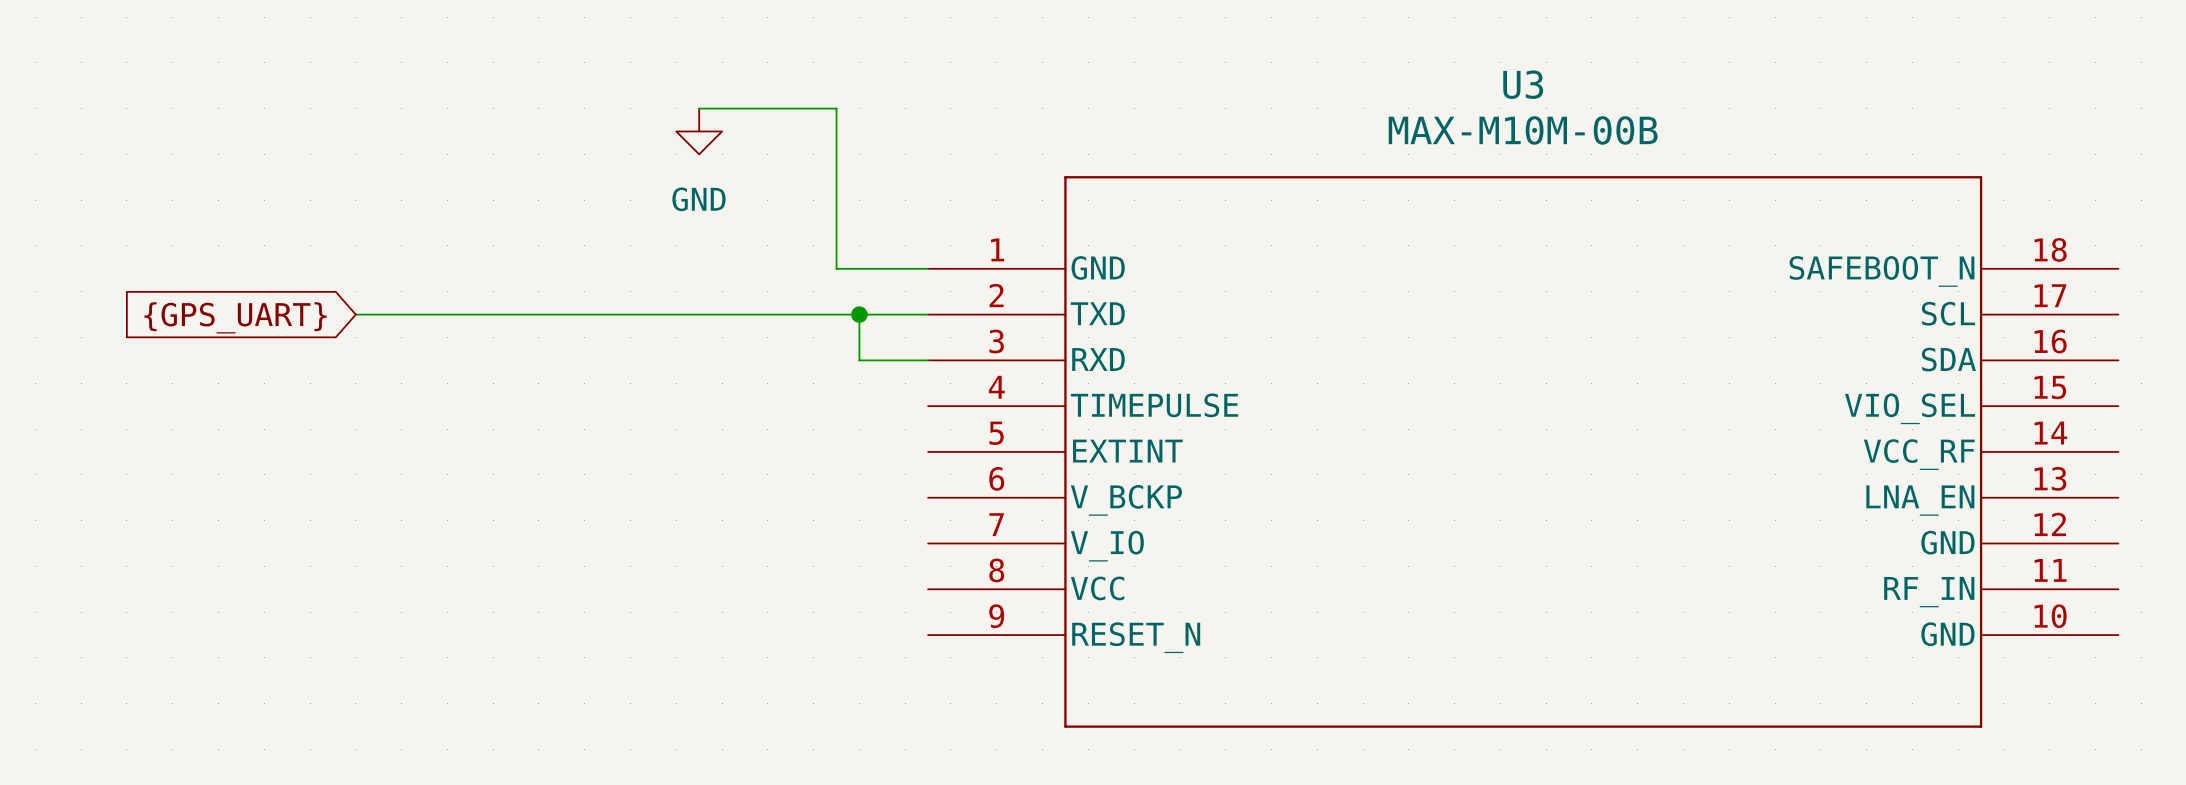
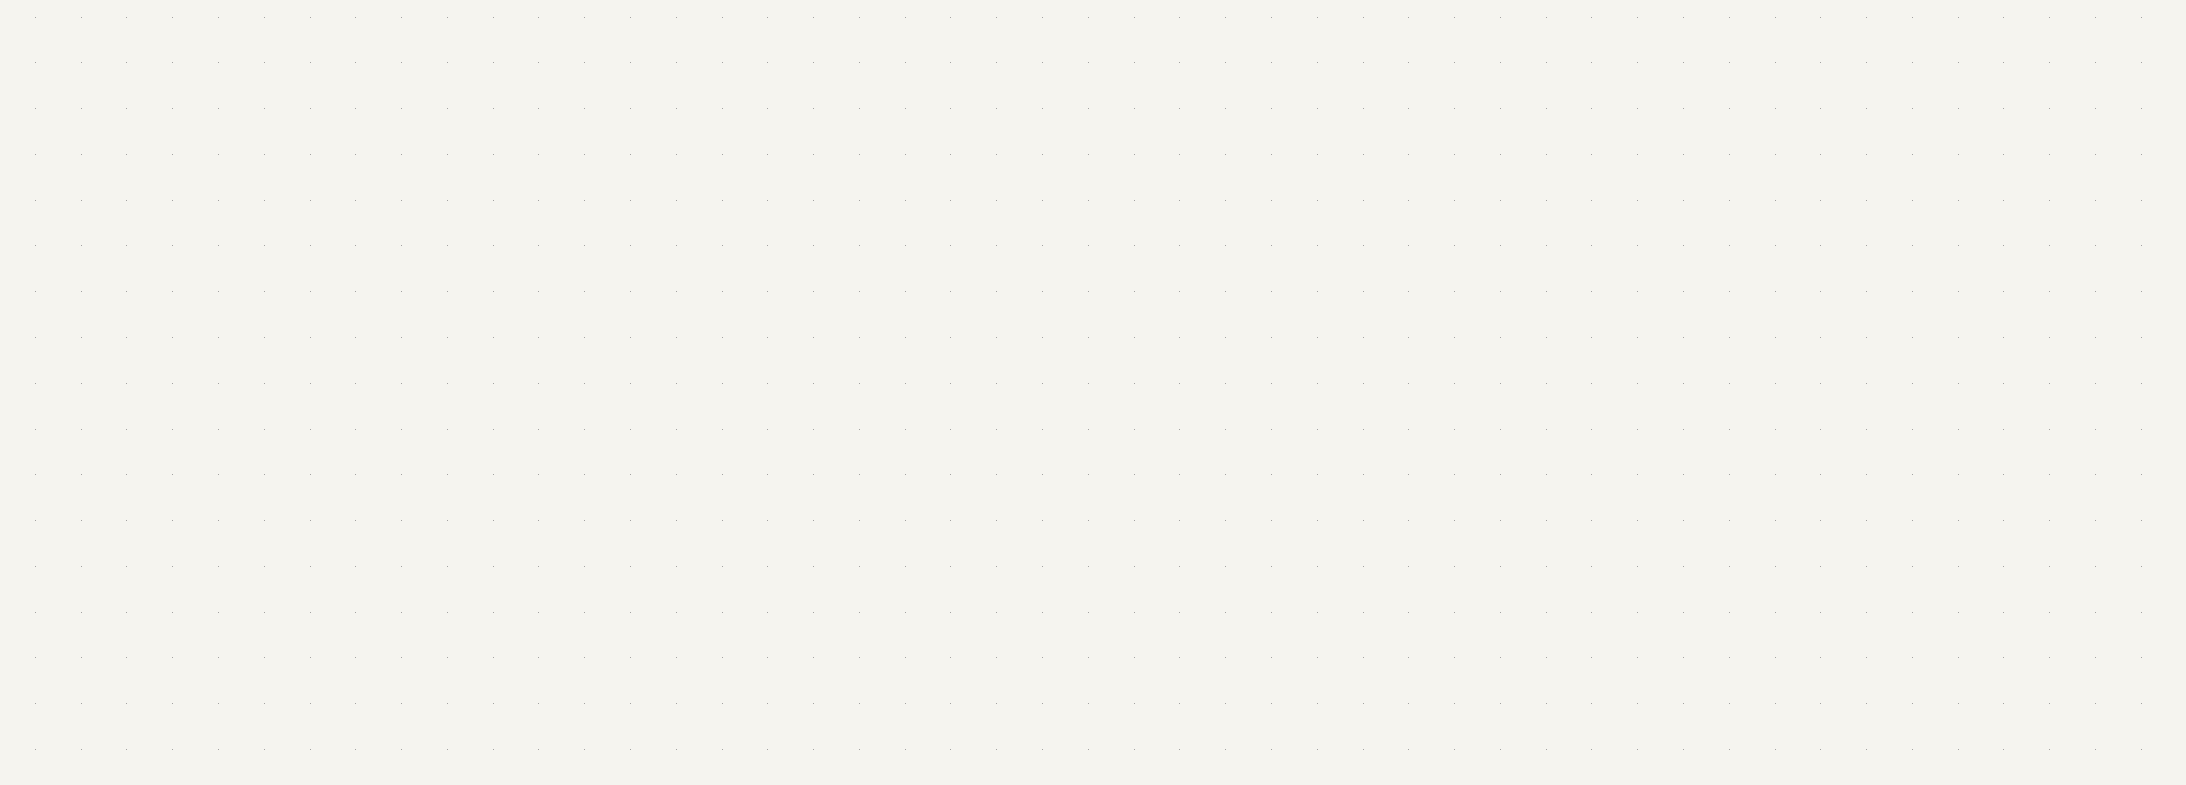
wire: (699, 108) (836, 108) (836, 268) (928, 268) -> none
power symbol: GND (699, 131) -> none
wire: (355, 314) (928, 314) -> none
wire: (859, 314) (859, 360) (928, 360) -> none
junction: (859, 314) -> none
global label: {GPS_UART} (235, 317) -> none
U3: MAX-M10M-00B (1523, 451) -> none

